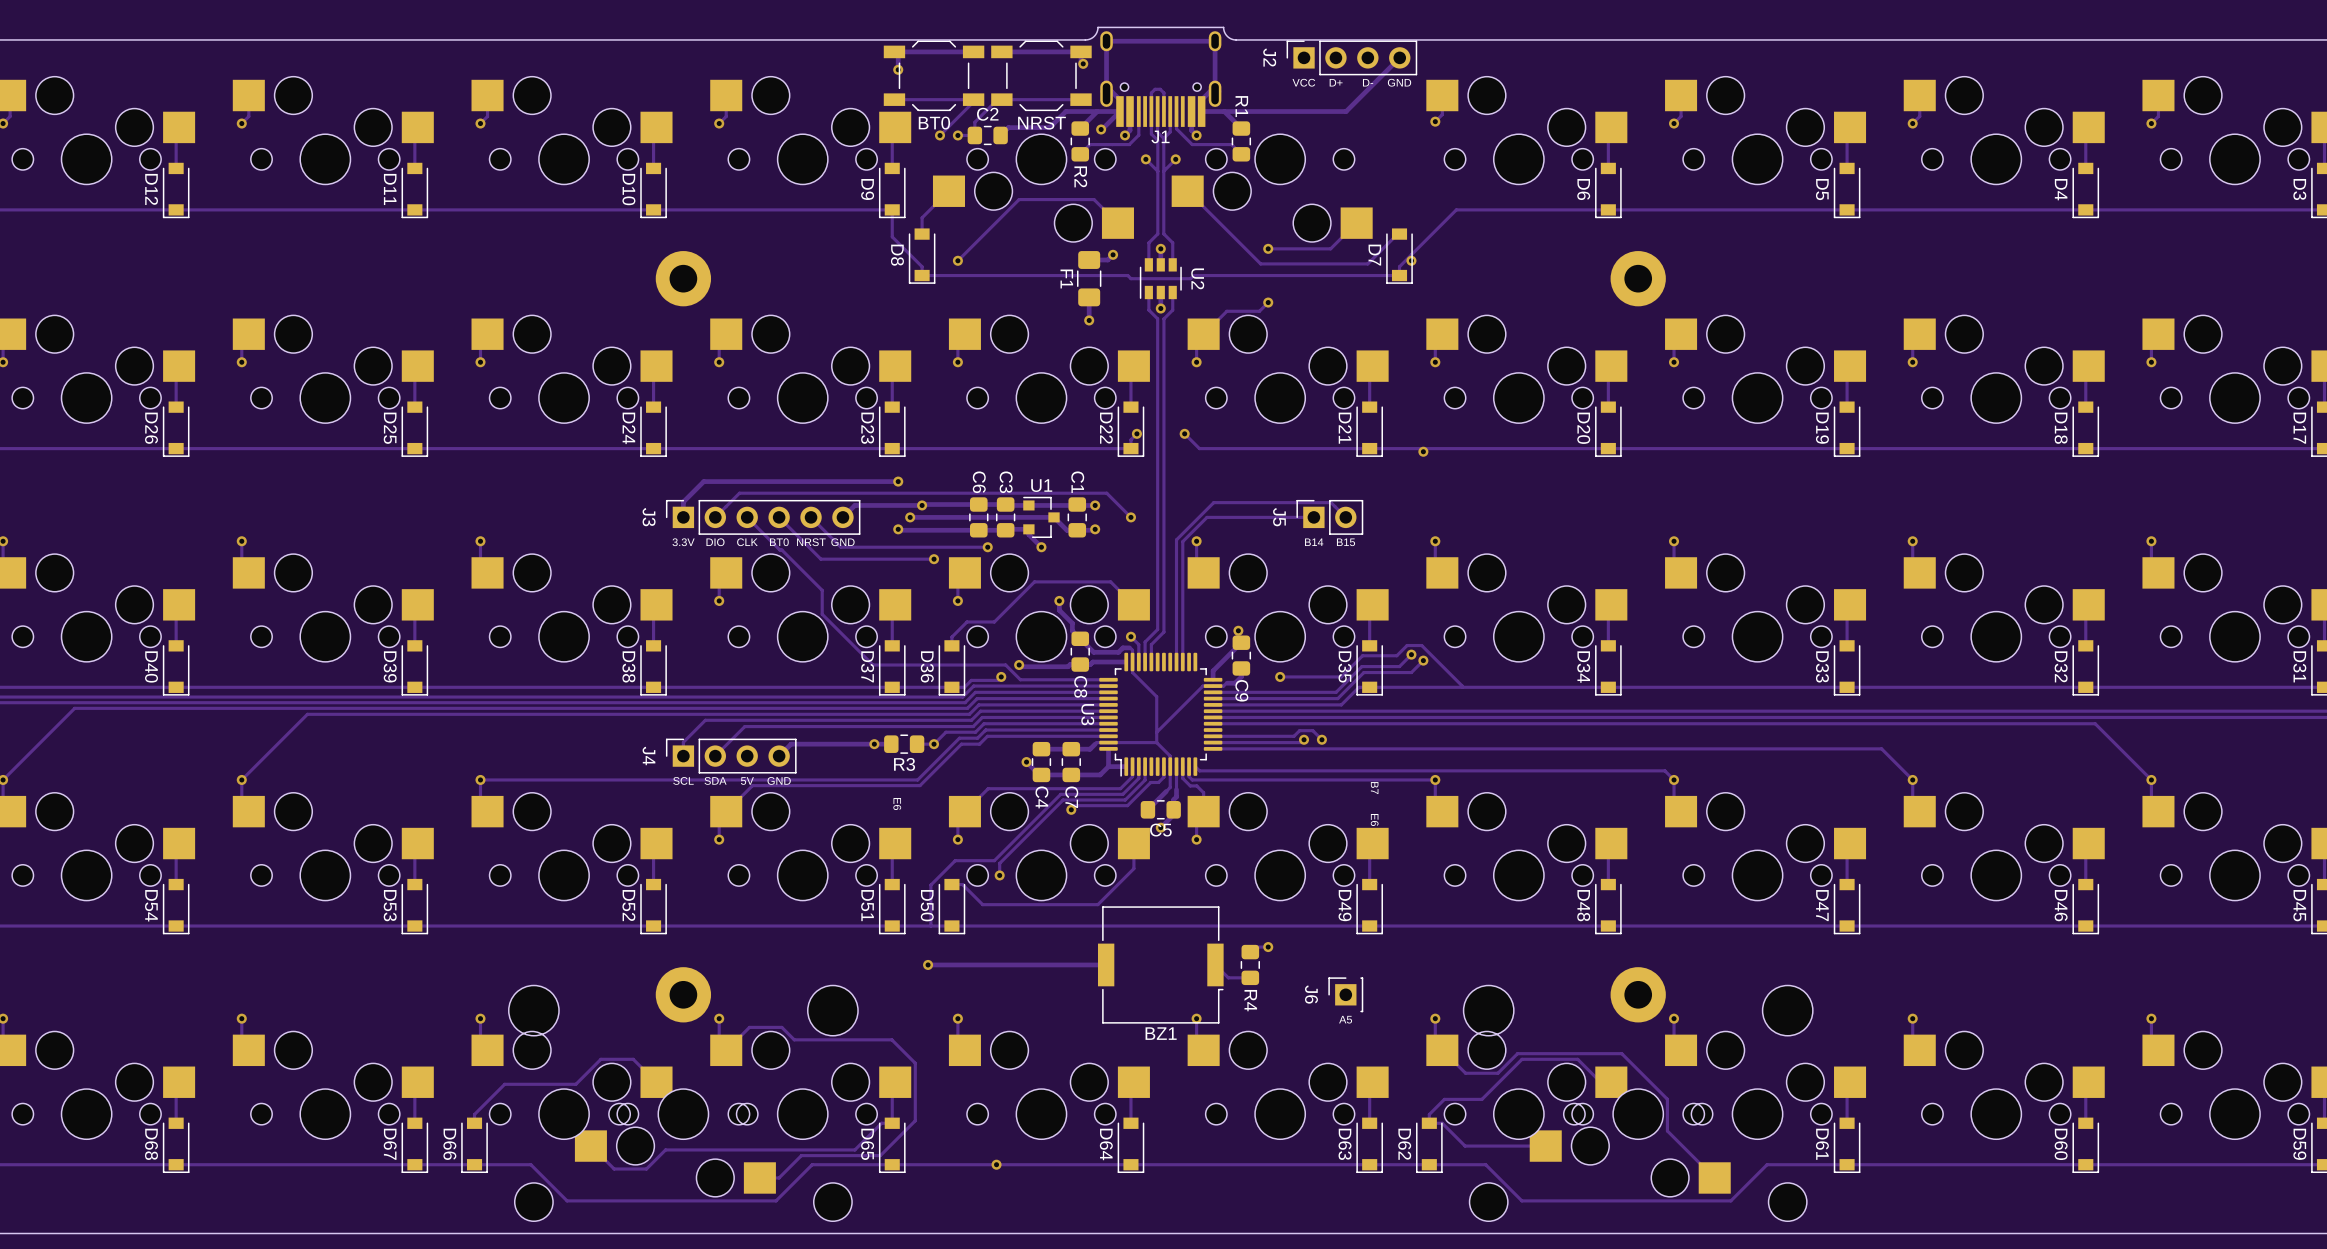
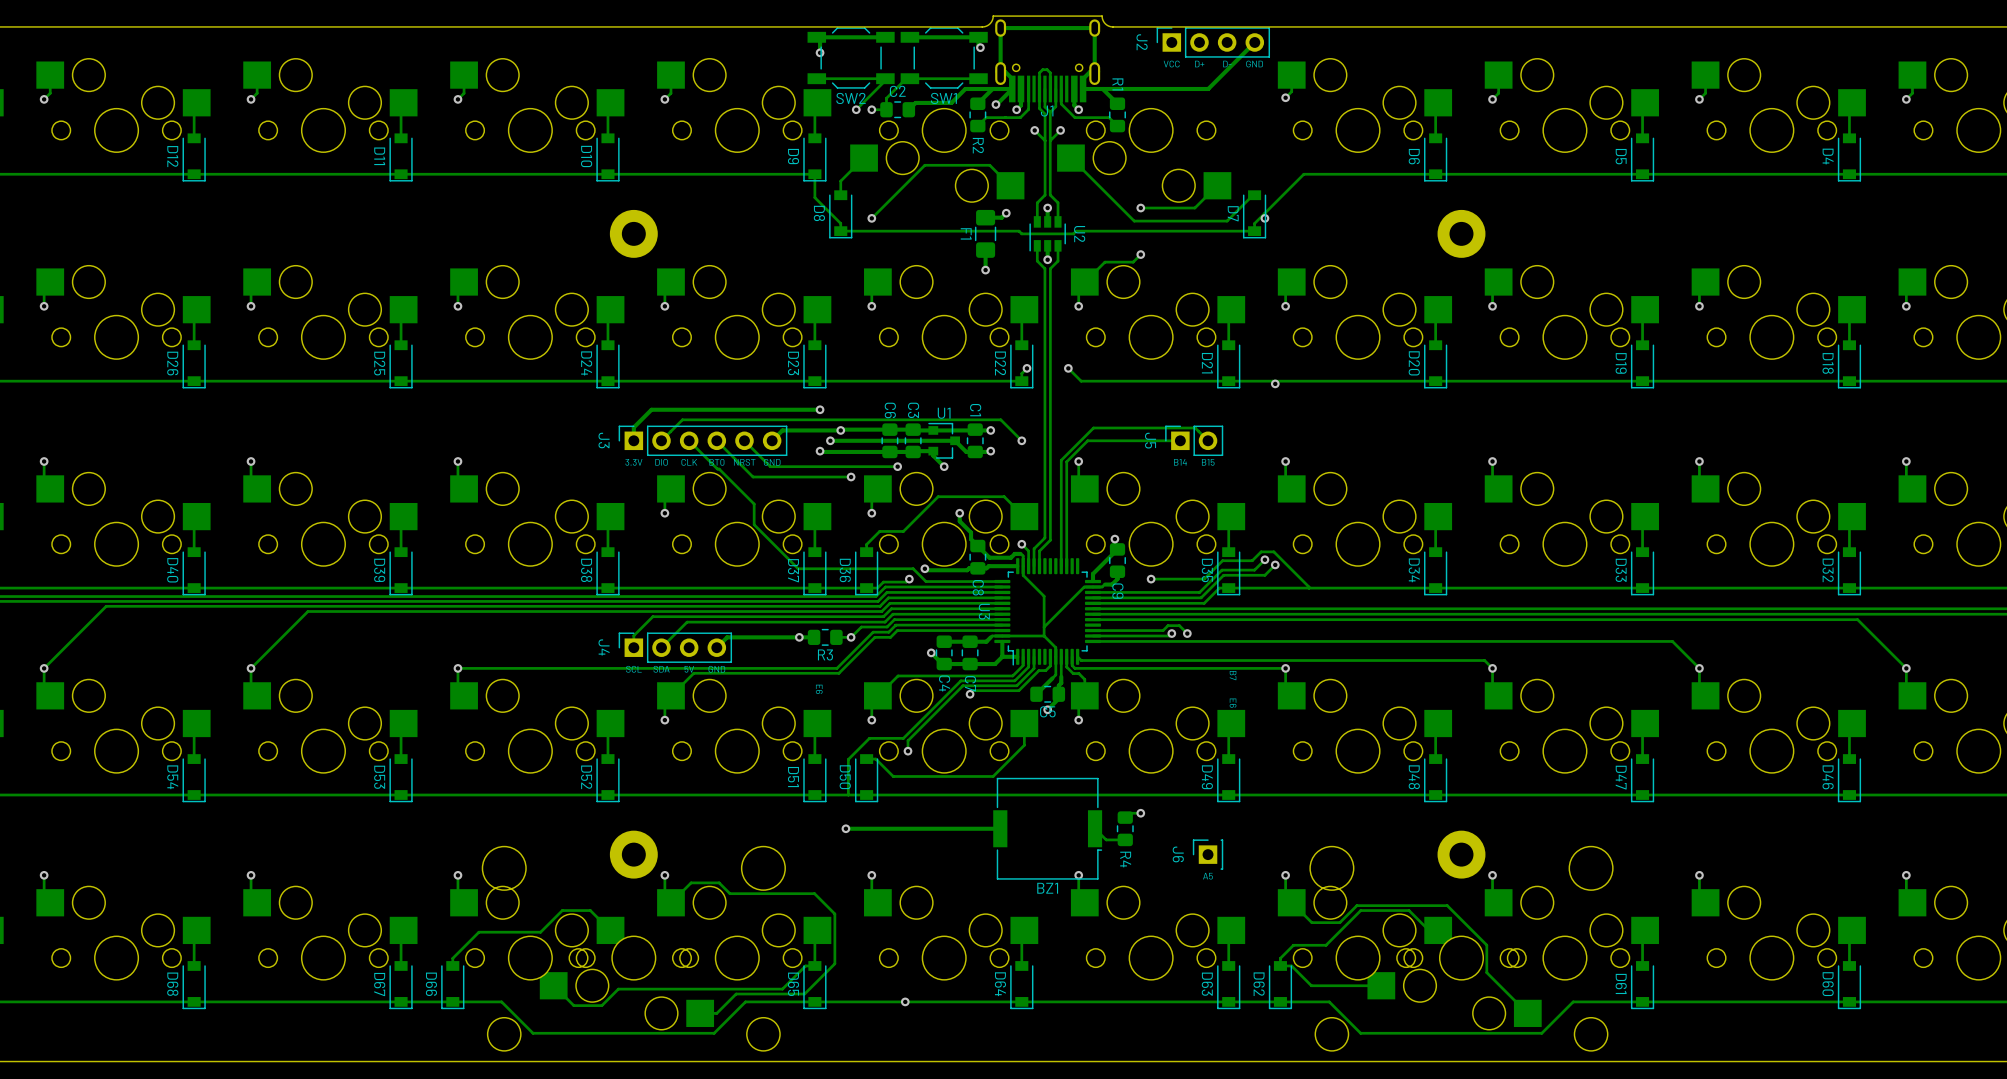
SW2 name: none -> SW2 (851, 98)
SW1 name: none -> SW1 (943, 98)
text: BT0 (934, 123) -> none
text: NRST (1041, 123) -> none

